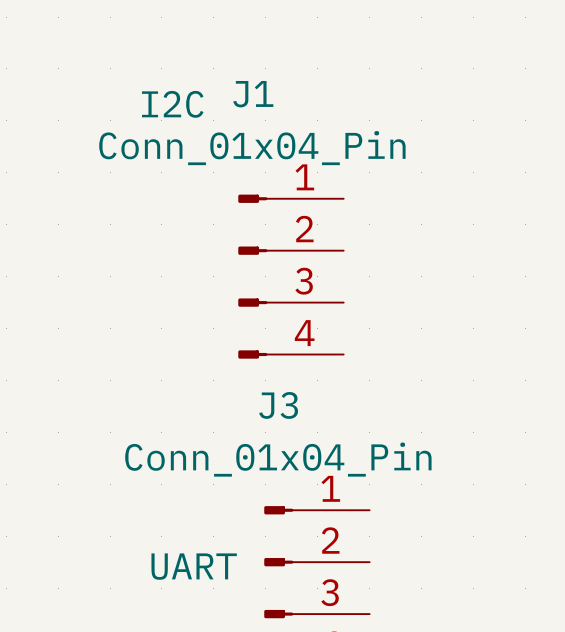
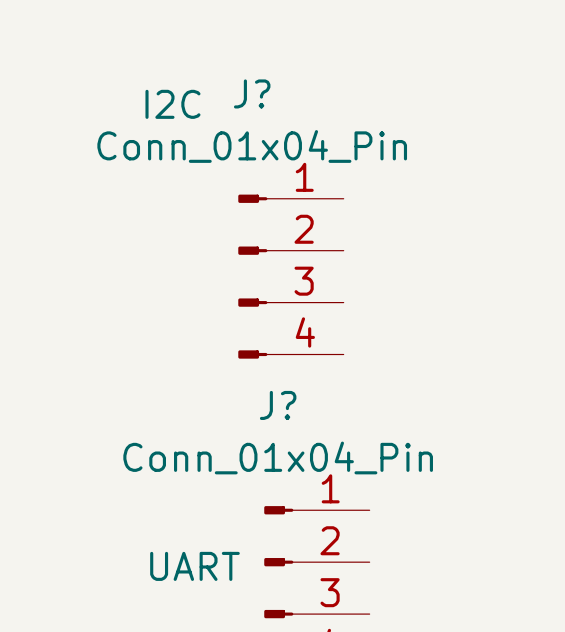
J1 name: J1 (253, 94) -> J? (252, 93)
J3 name: J3 (278, 405) -> J? (278, 405)

